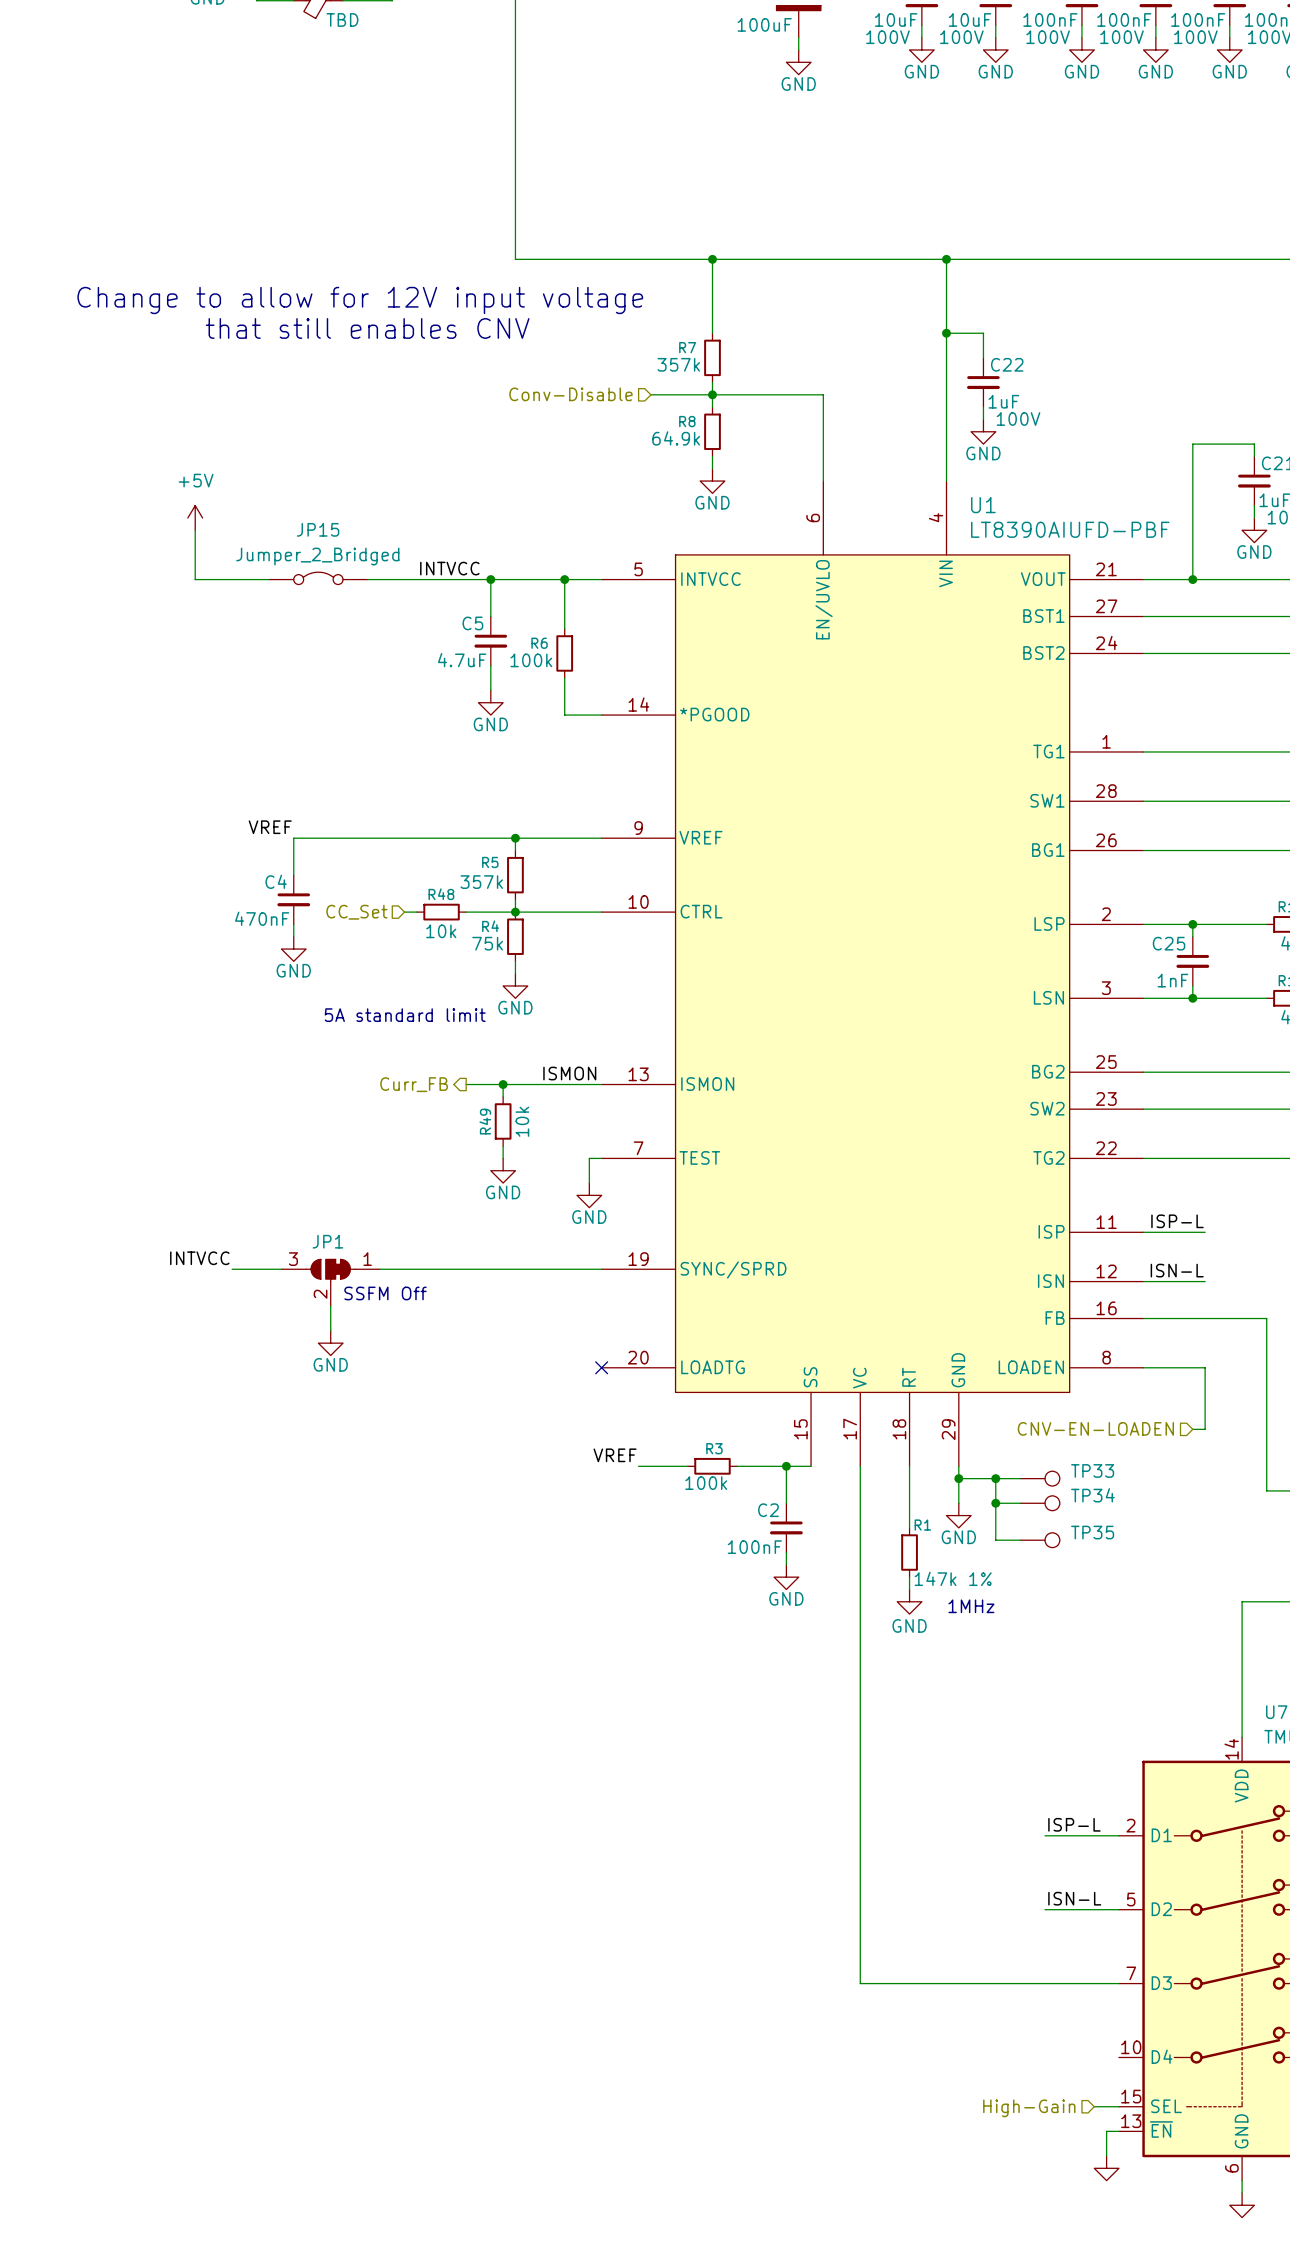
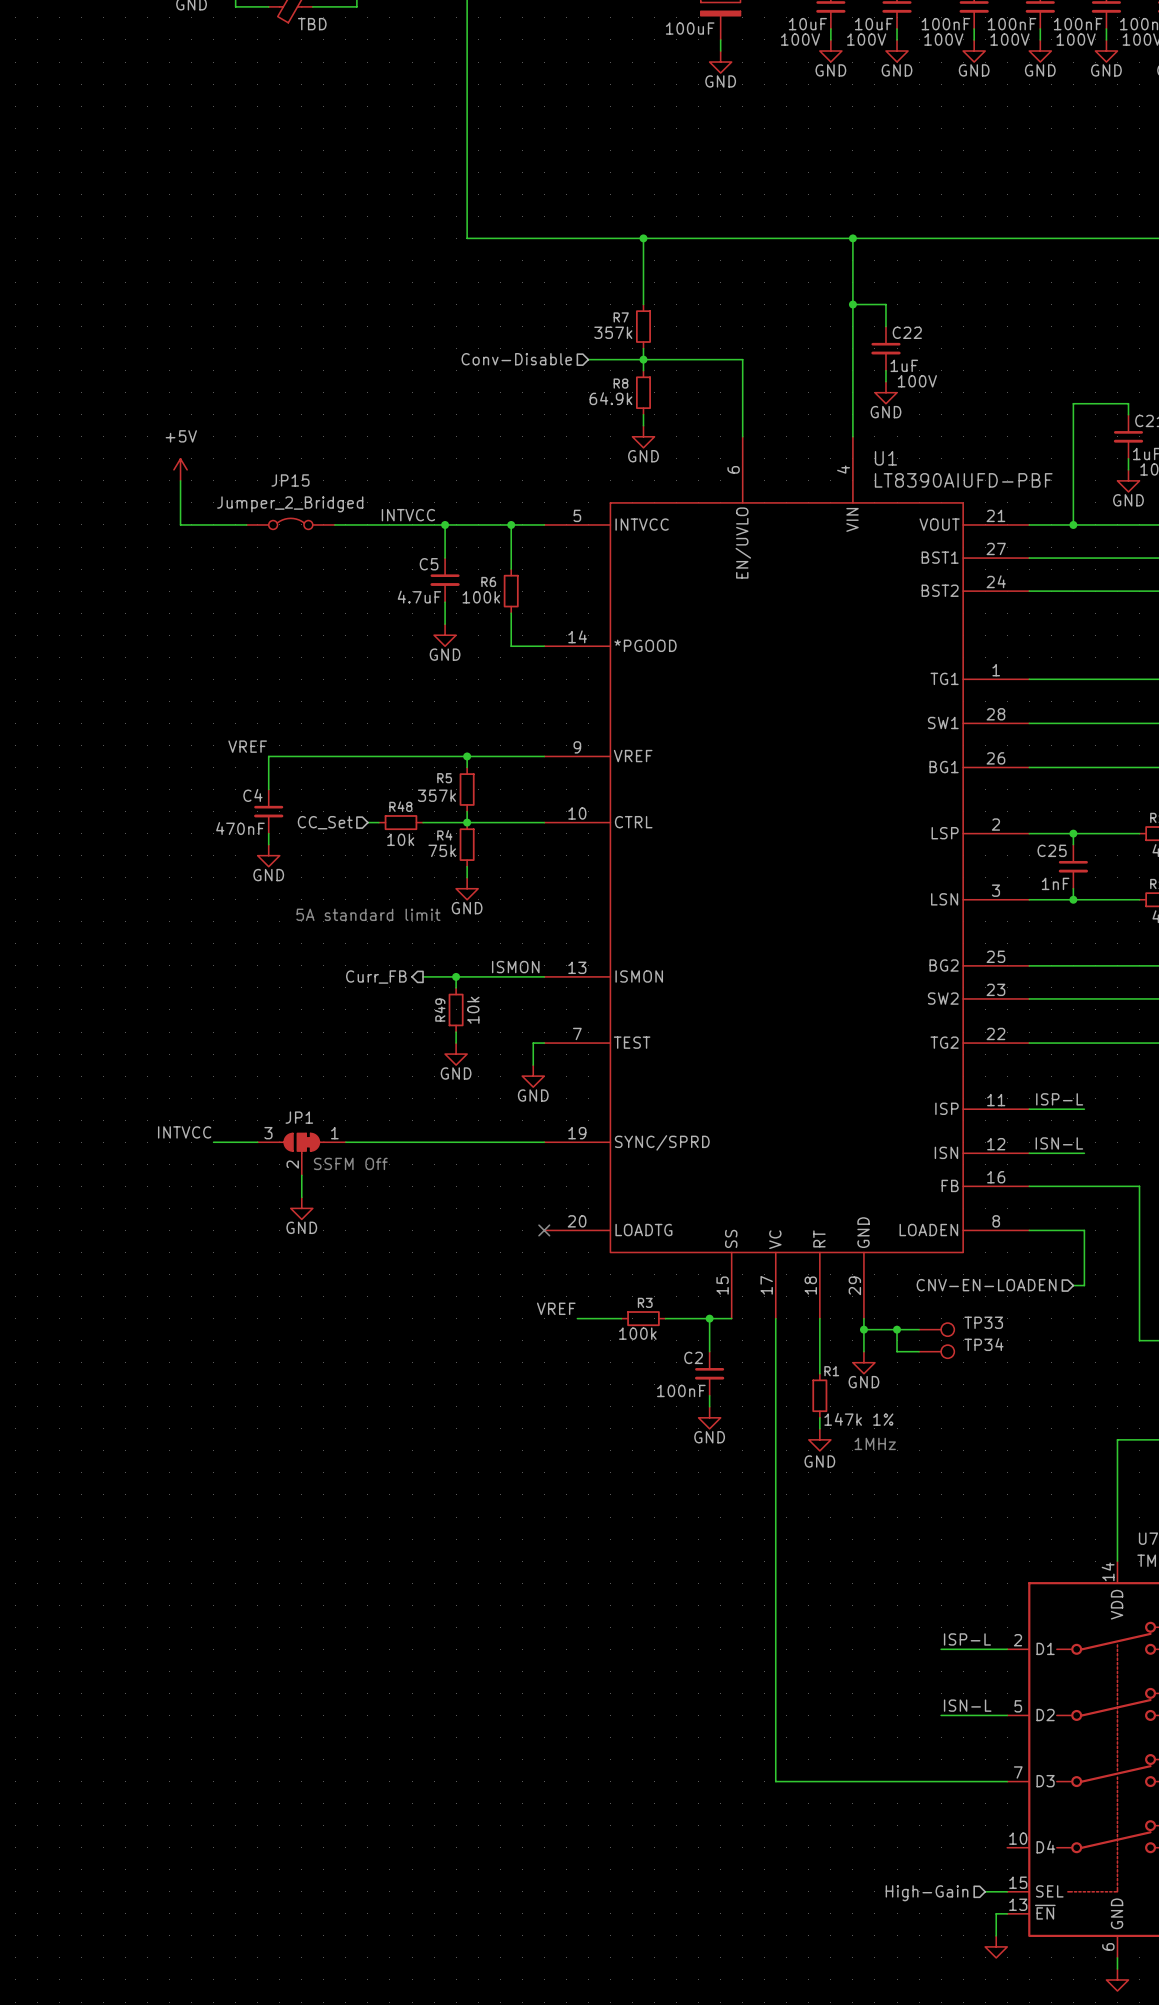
text: Change to allow for 12V input voltage (360, 300) -> none
text: that still enables CNV (367, 328) -> none
wire: (995, 1503) (995, 1540) (1020, 1540) -> none
junction: (995, 1503) -> none
TP35: (1040, 1540) -> none

